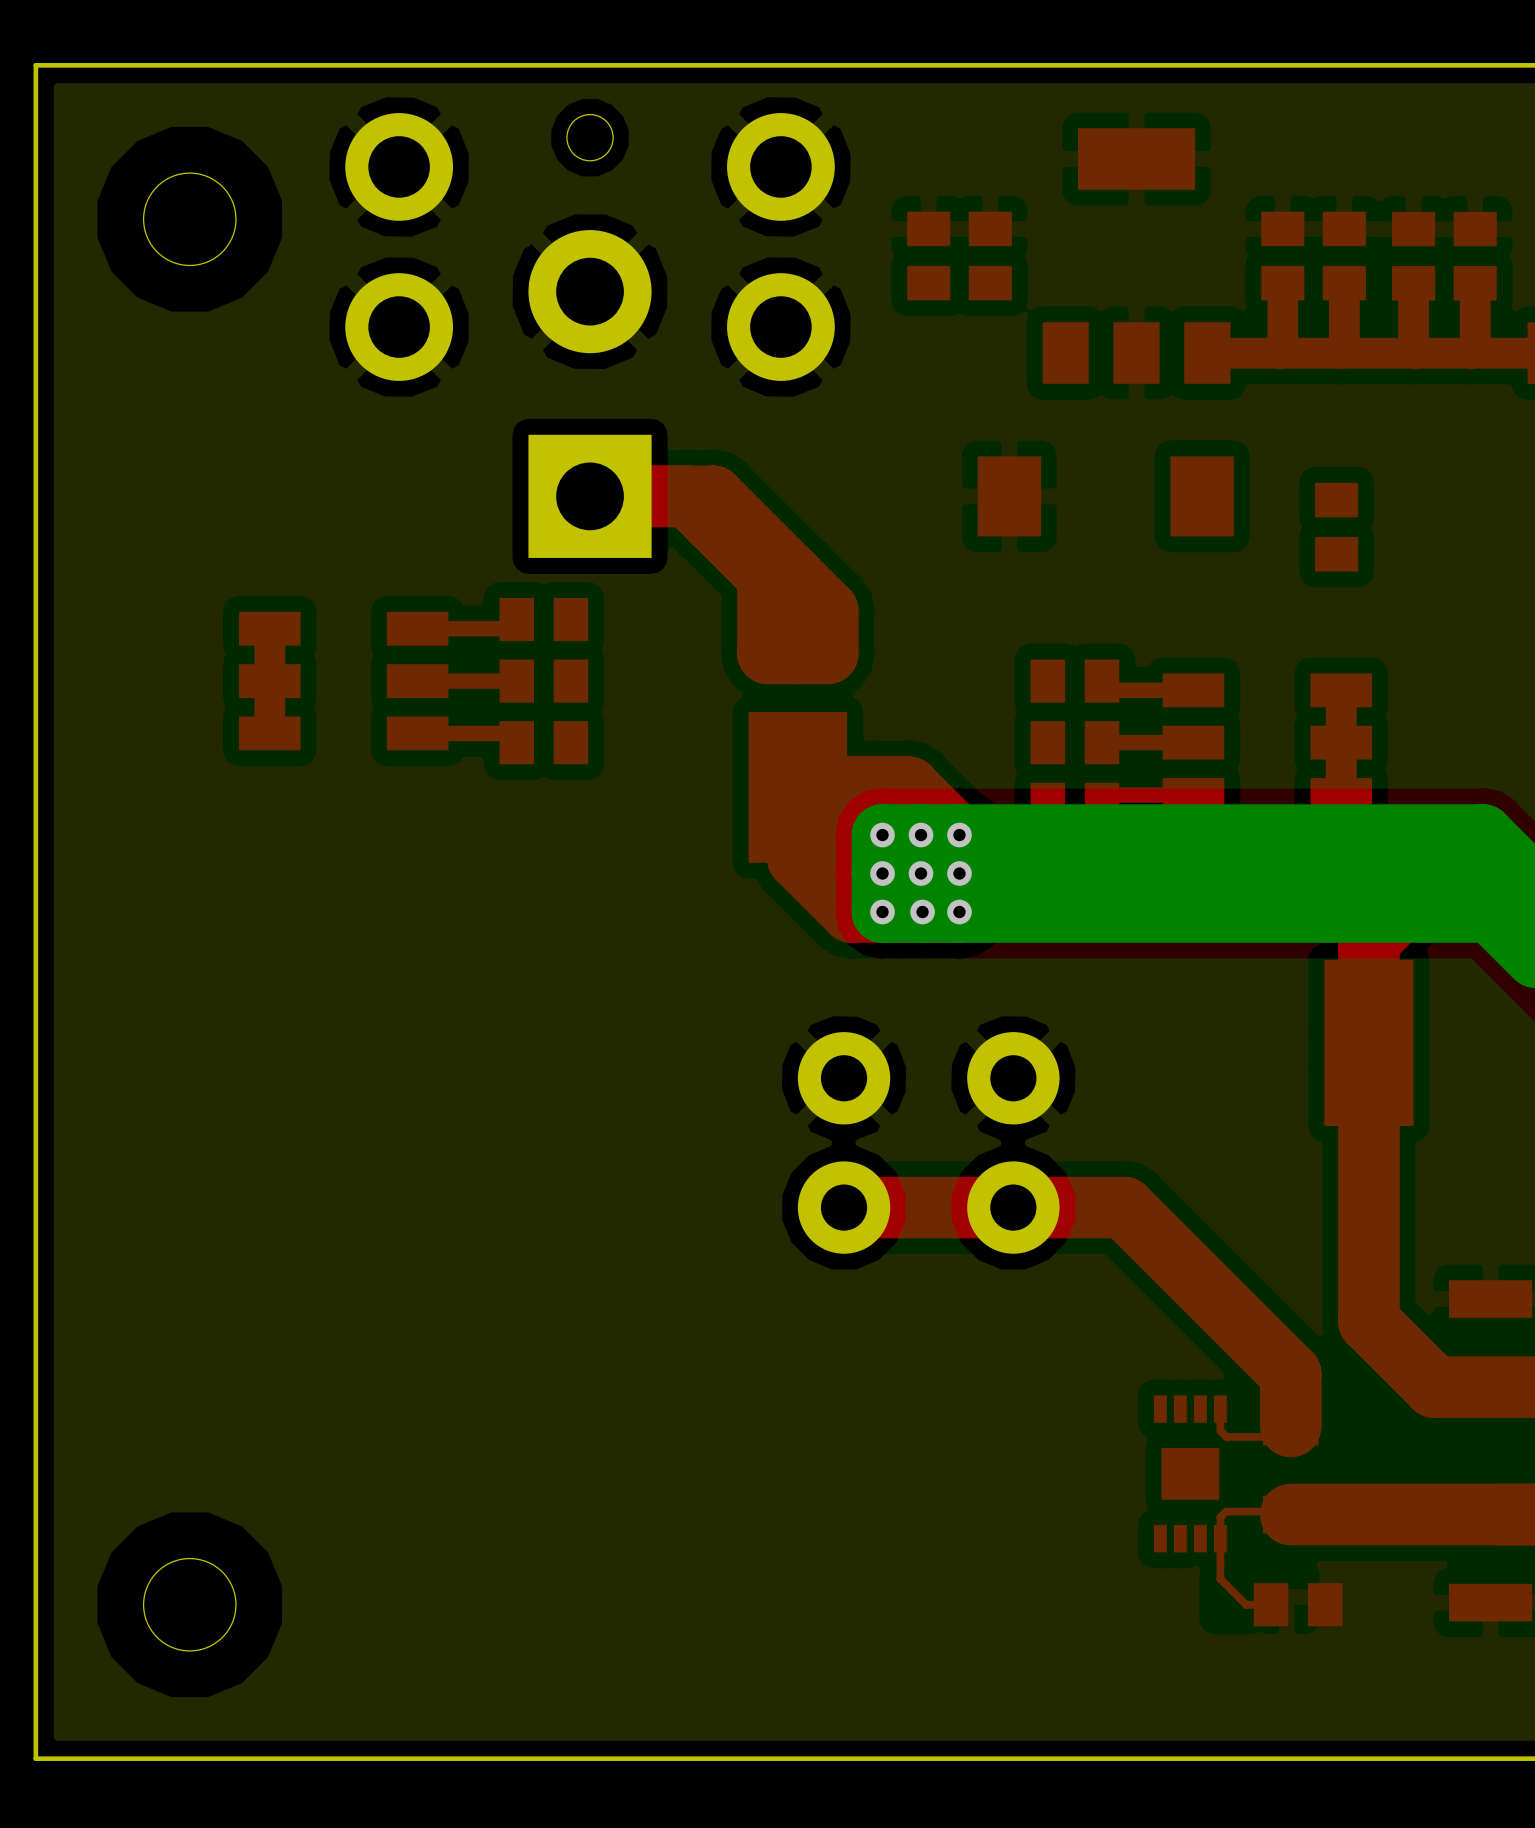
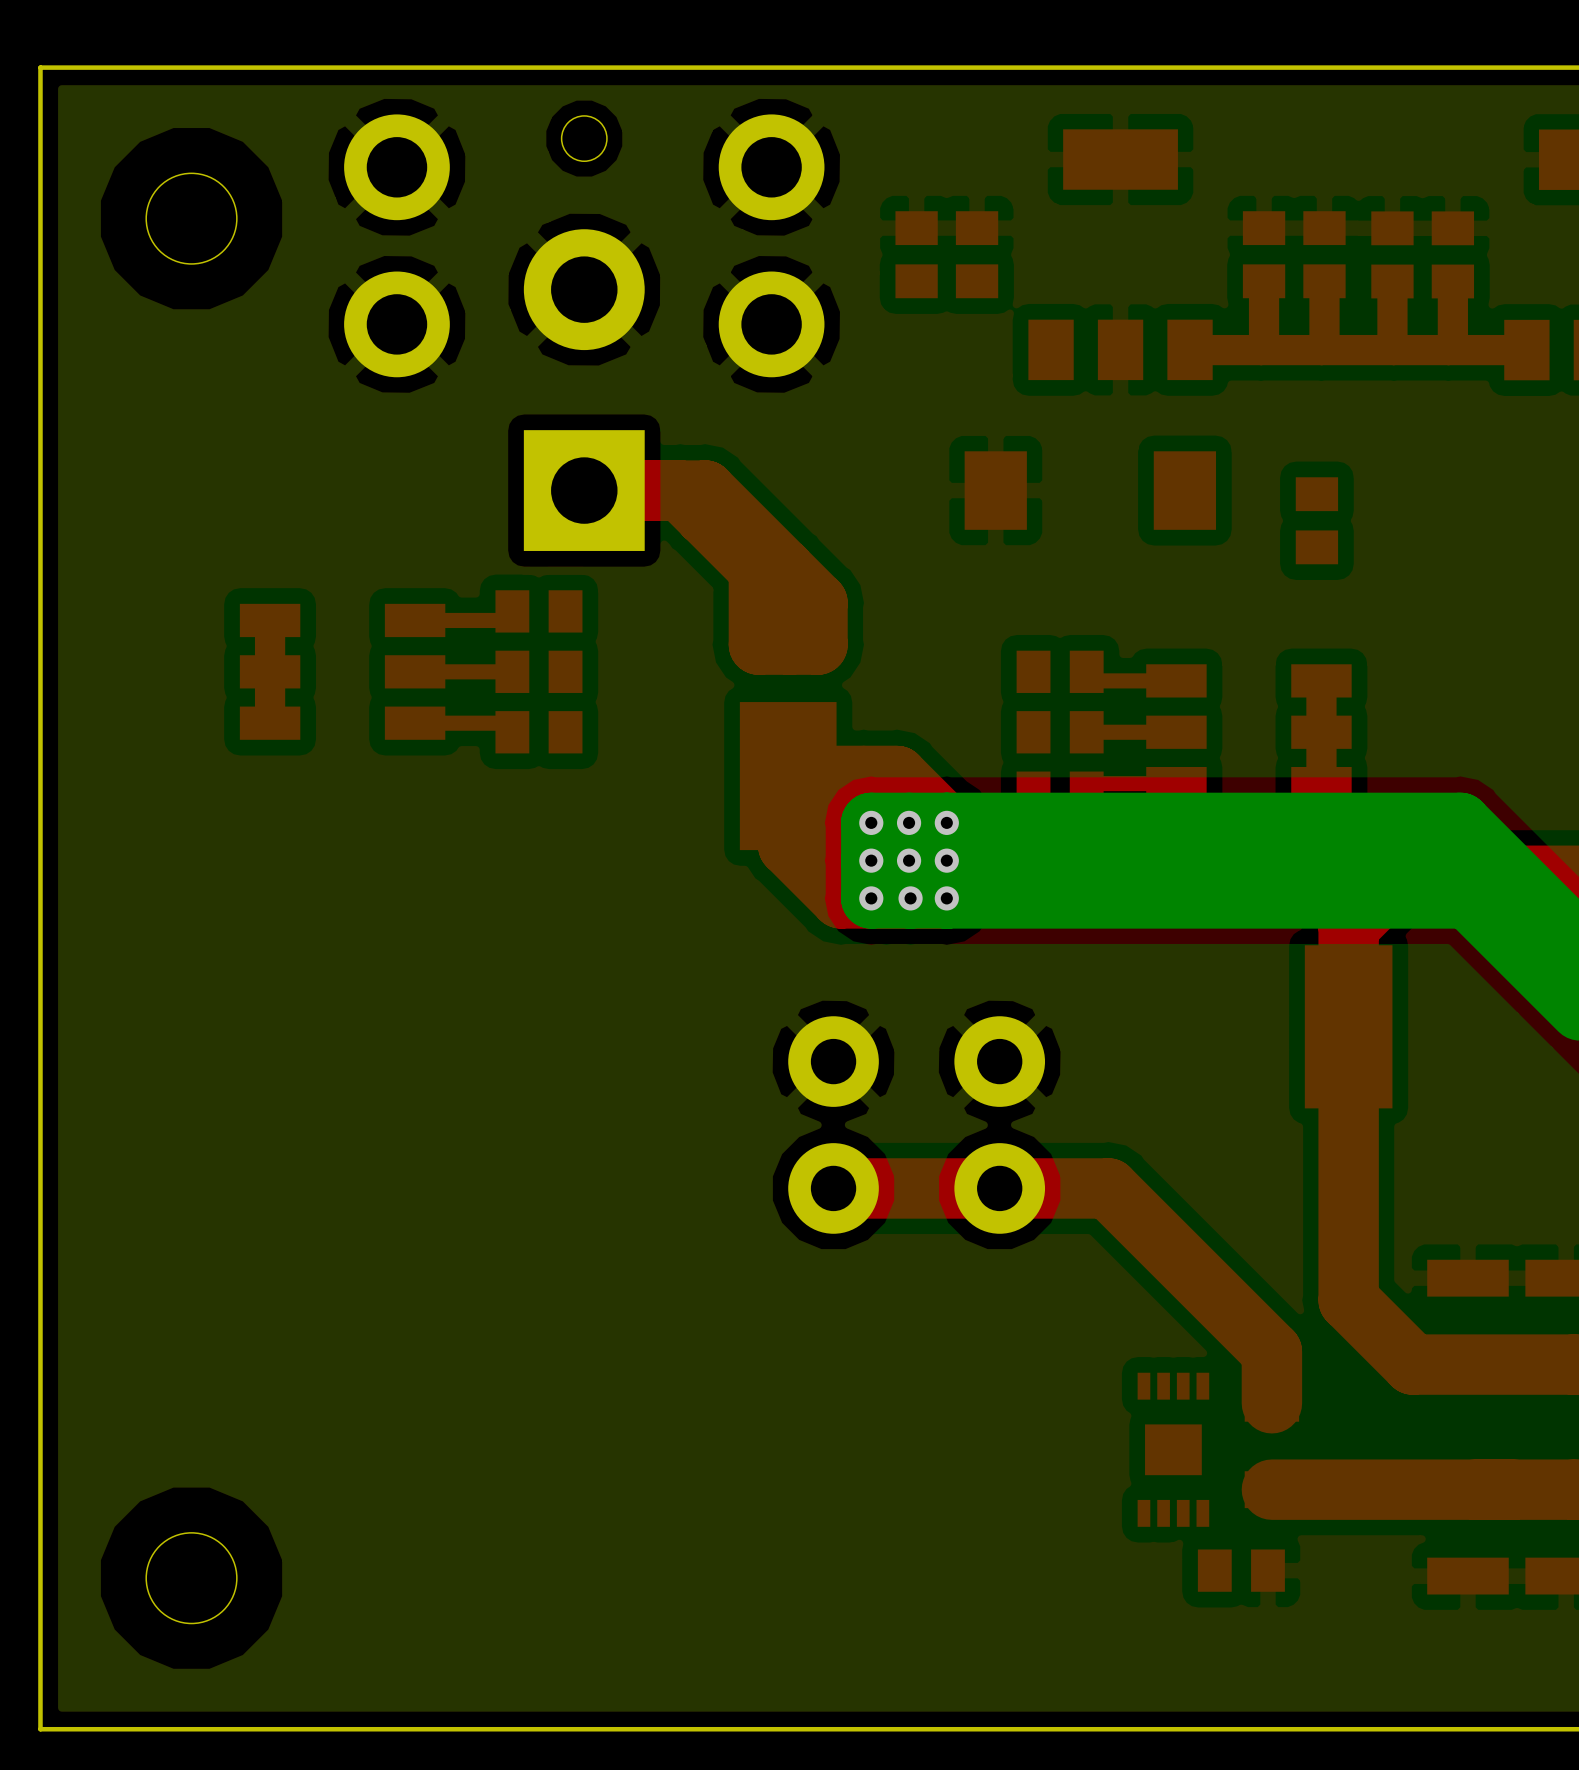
top track: (1220, 1409) (1220, 1430) (1226, 1436) (1280, 1436) (1290, 1426) -> none
top track: (1290, 1514) (1287, 1511) (1226, 1511) (1220, 1517) (1220, 1579) (1246, 1604) (1271, 1604) -> none
part position: (1298, 1604) -> (1241, 1570)

